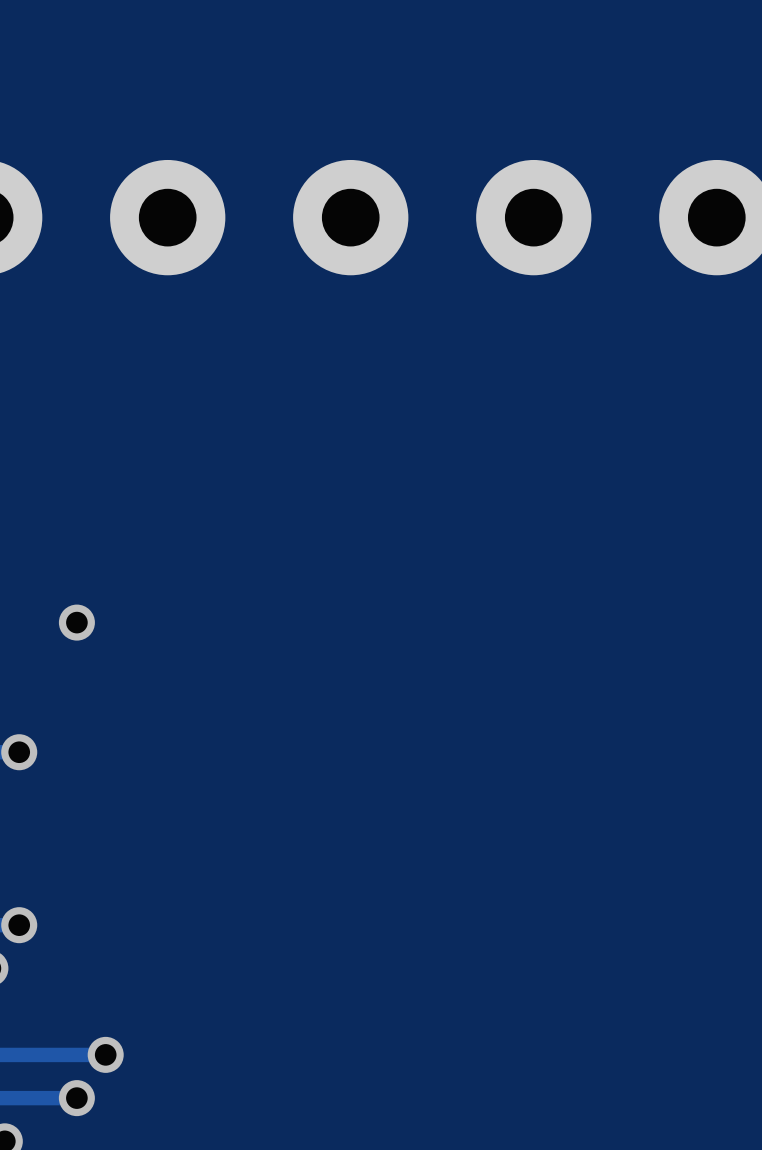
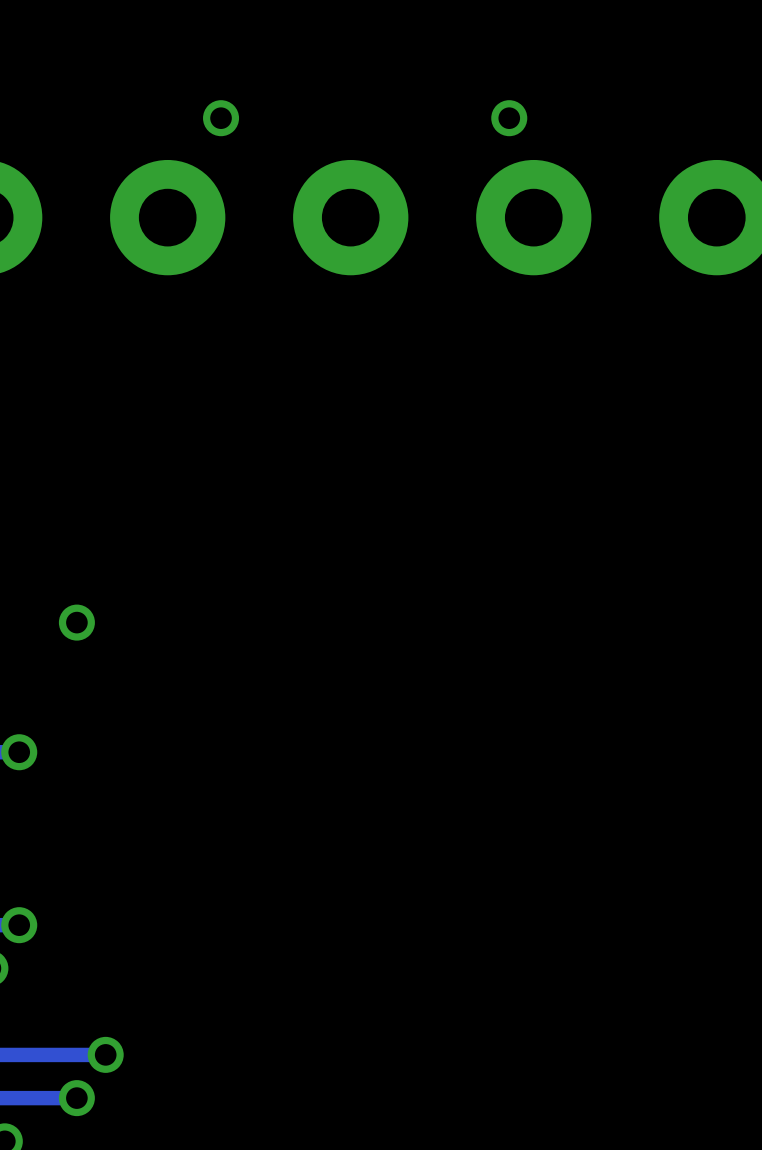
via: none -> (221, 118)
via: none -> (509, 118)

